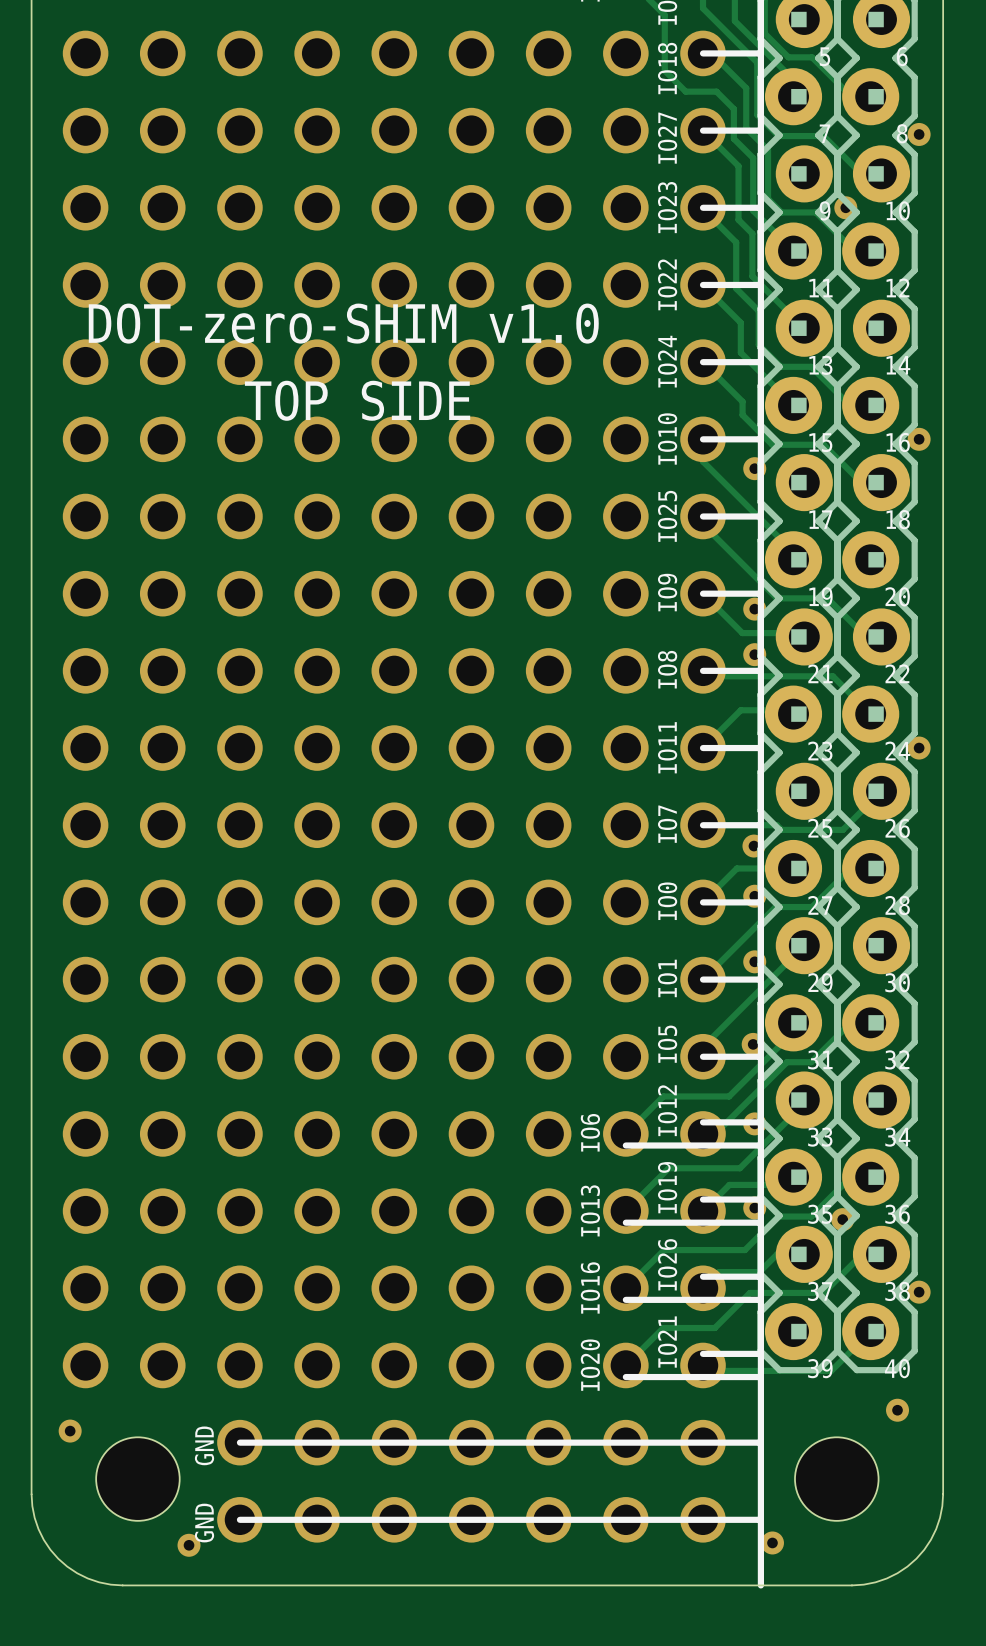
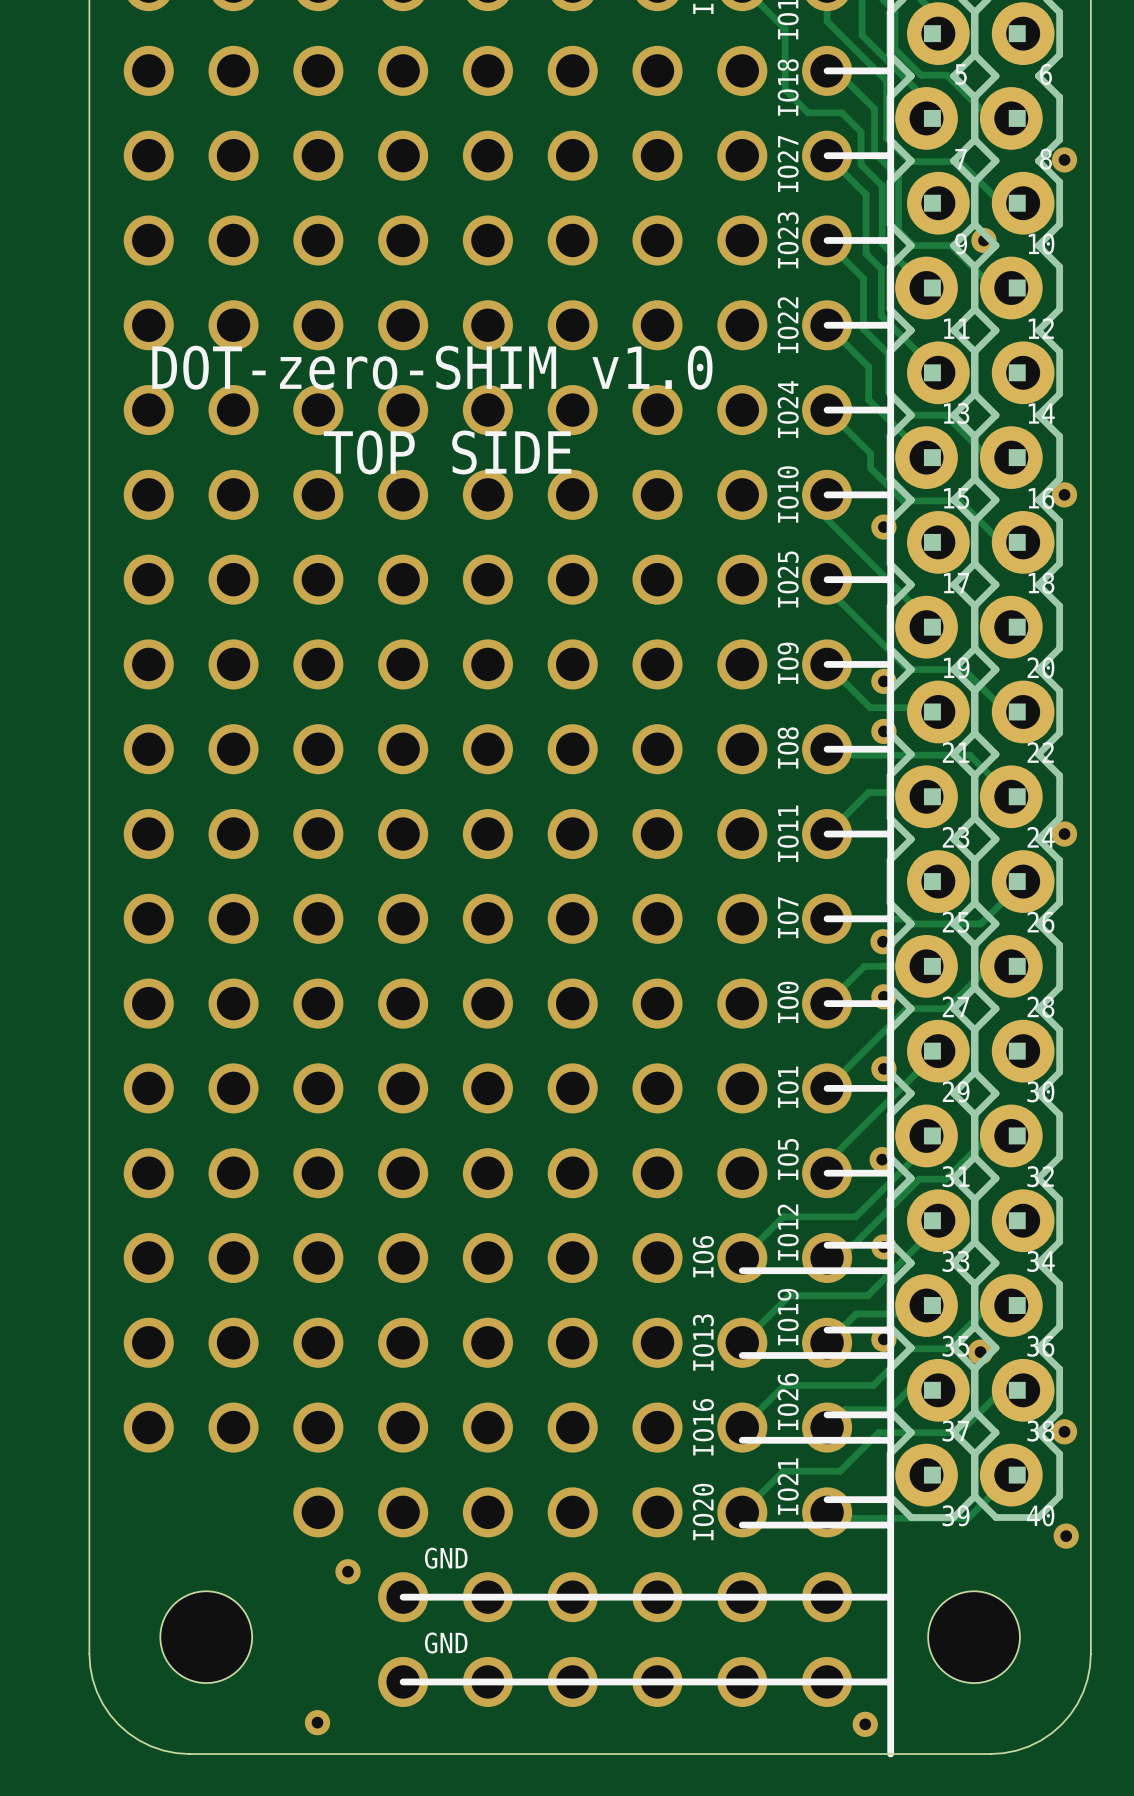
via: (85, 1365) -> none
via: (162, 1365) -> none
text: none -> GND (446, 1558)
via position: (897, 1410) -> (1066, 1536)
via: none -> (348, 1571)
via: (70, 1431) -> none
line: (239, 1442) (317, 1442) -> none
via: (239, 1442) -> none
text: GND (204, 1445) -> none
text: none -> GND (446, 1643)
line: (239, 1519) (317, 1519) -> none
via: (239, 1519) -> none
text: GND (204, 1523) -> none
via position: (772, 1542) -> (865, 1724)
via position: (189, 1545) -> (317, 1722)

